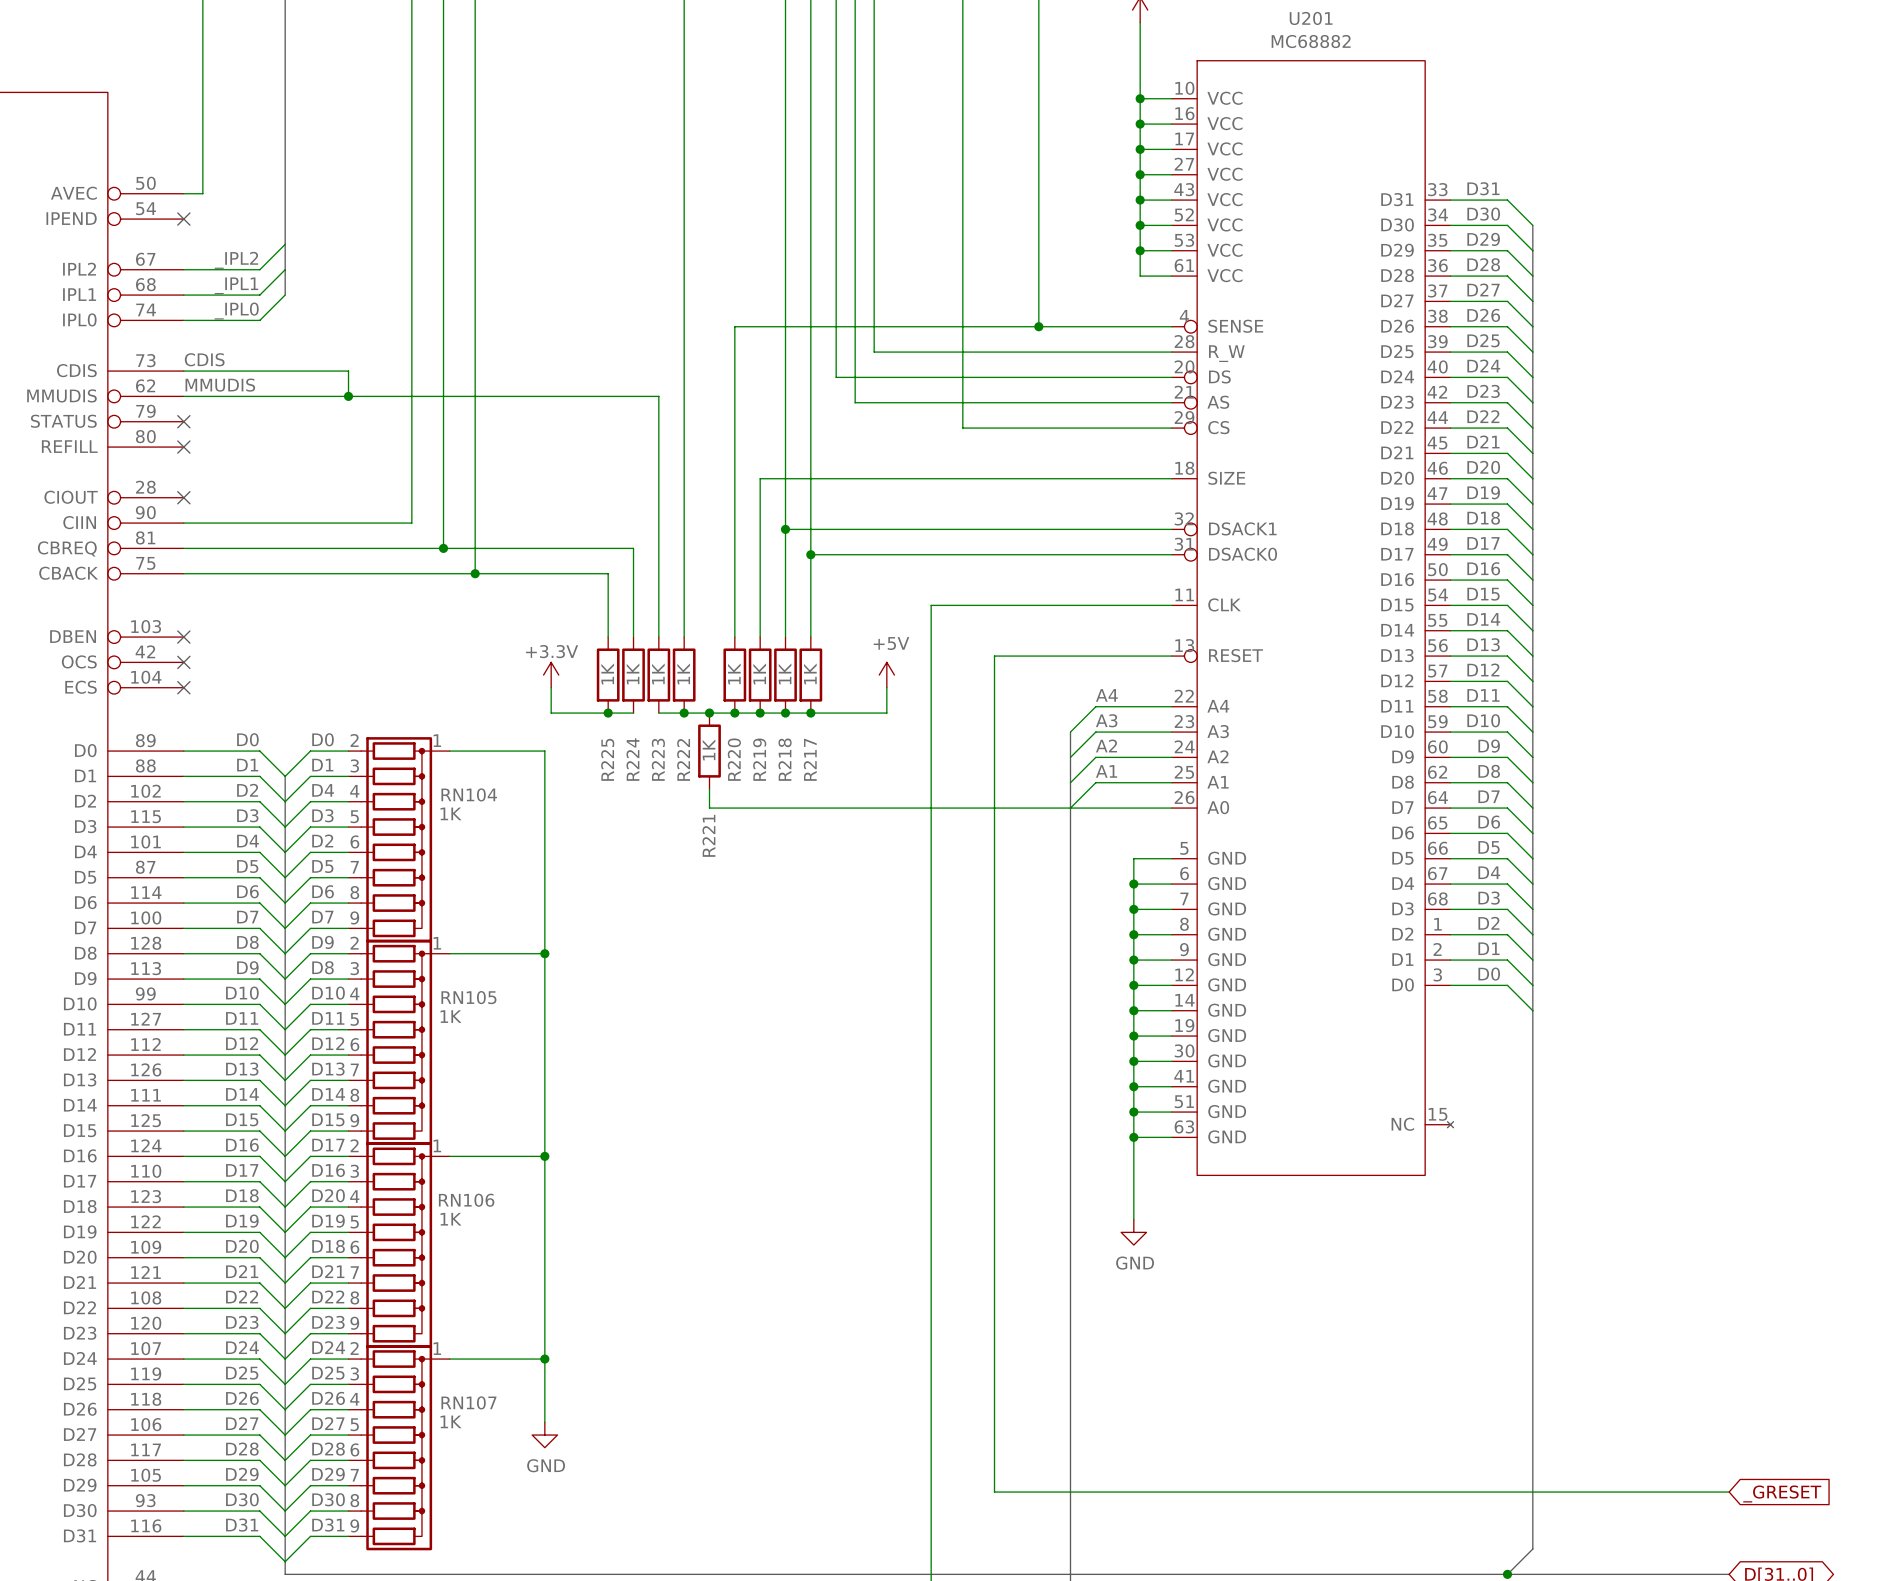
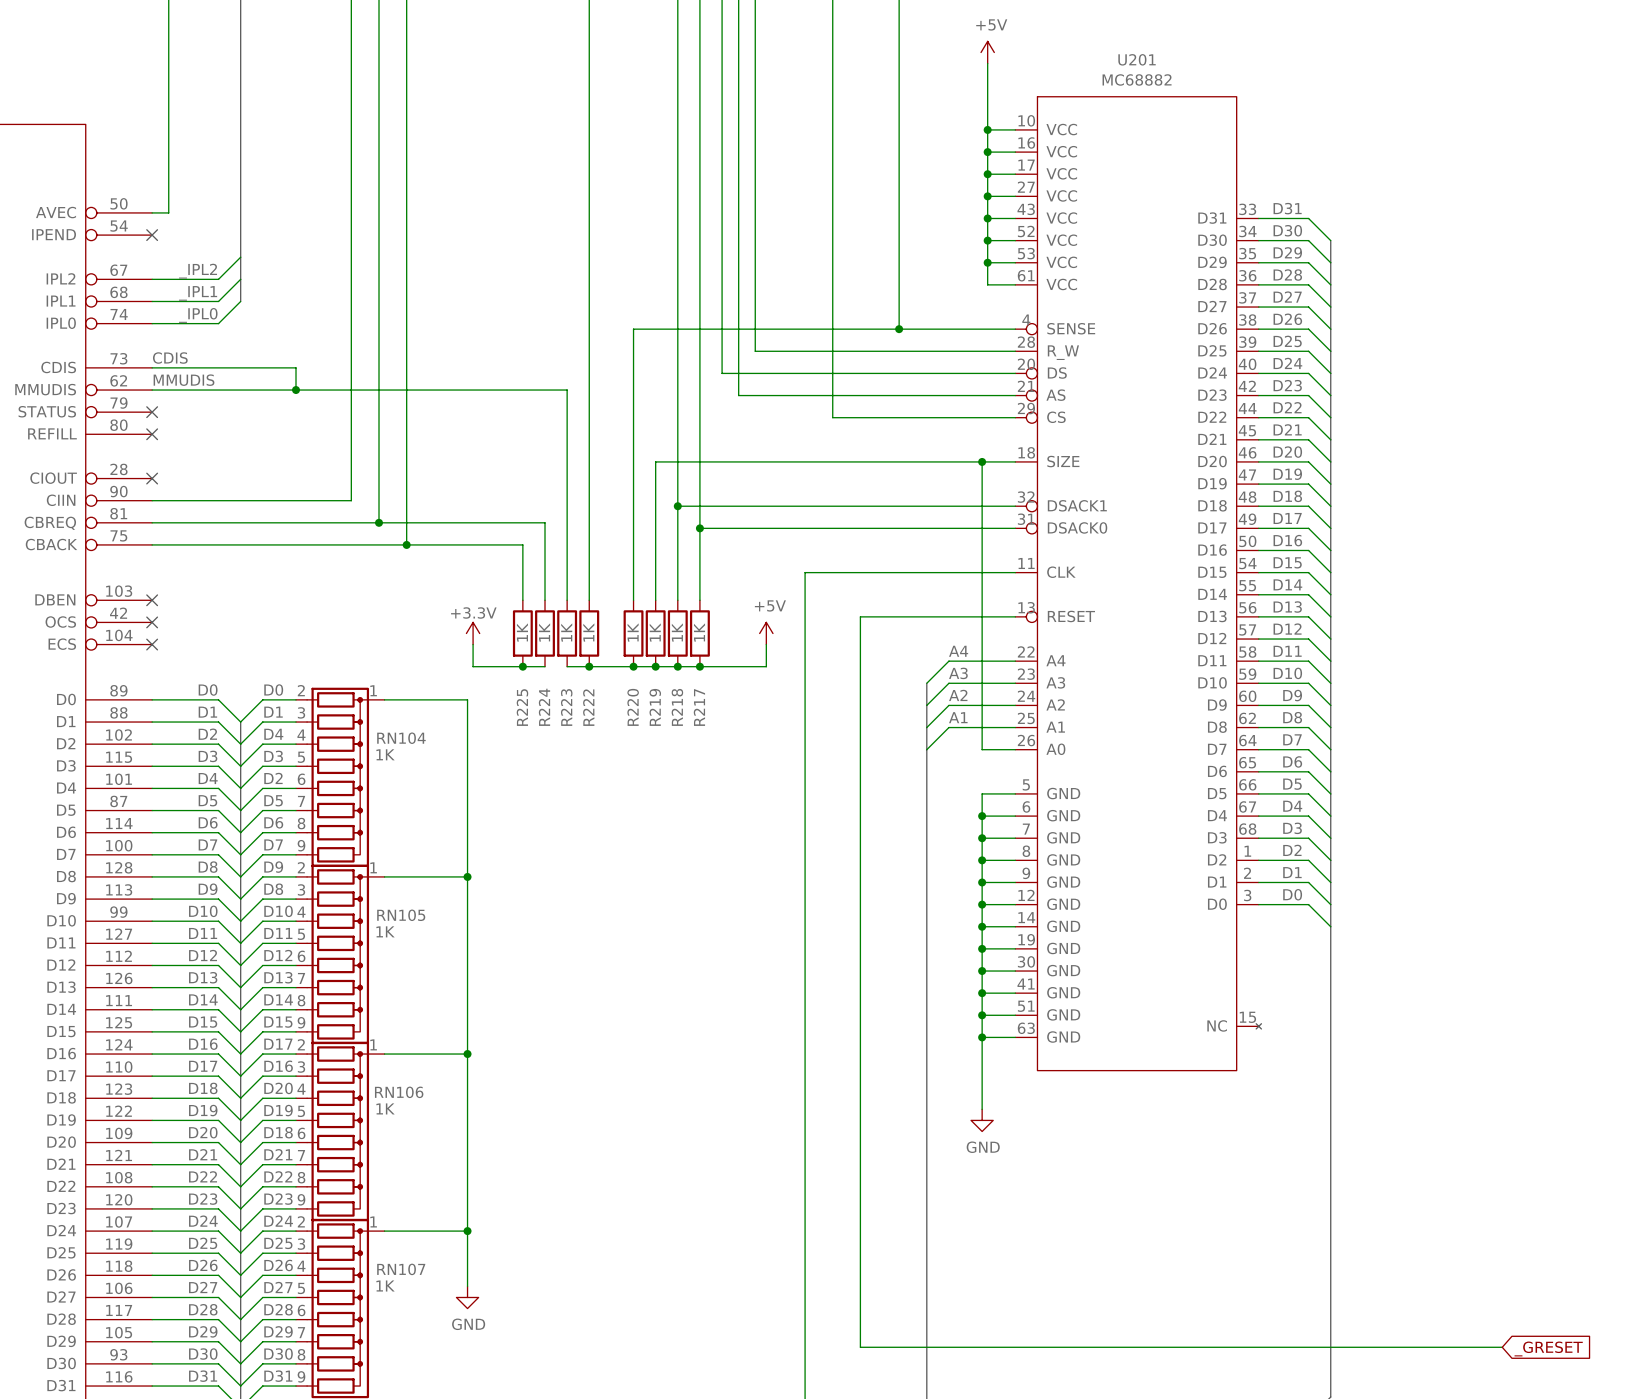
junction: none -> (982, 461)
junction: (709, 713) -> none
R221: 1K (709, 751) -> none
wire: (709, 789) (709, 808) (1133, 808) -> (982, 461) (982, 749)

